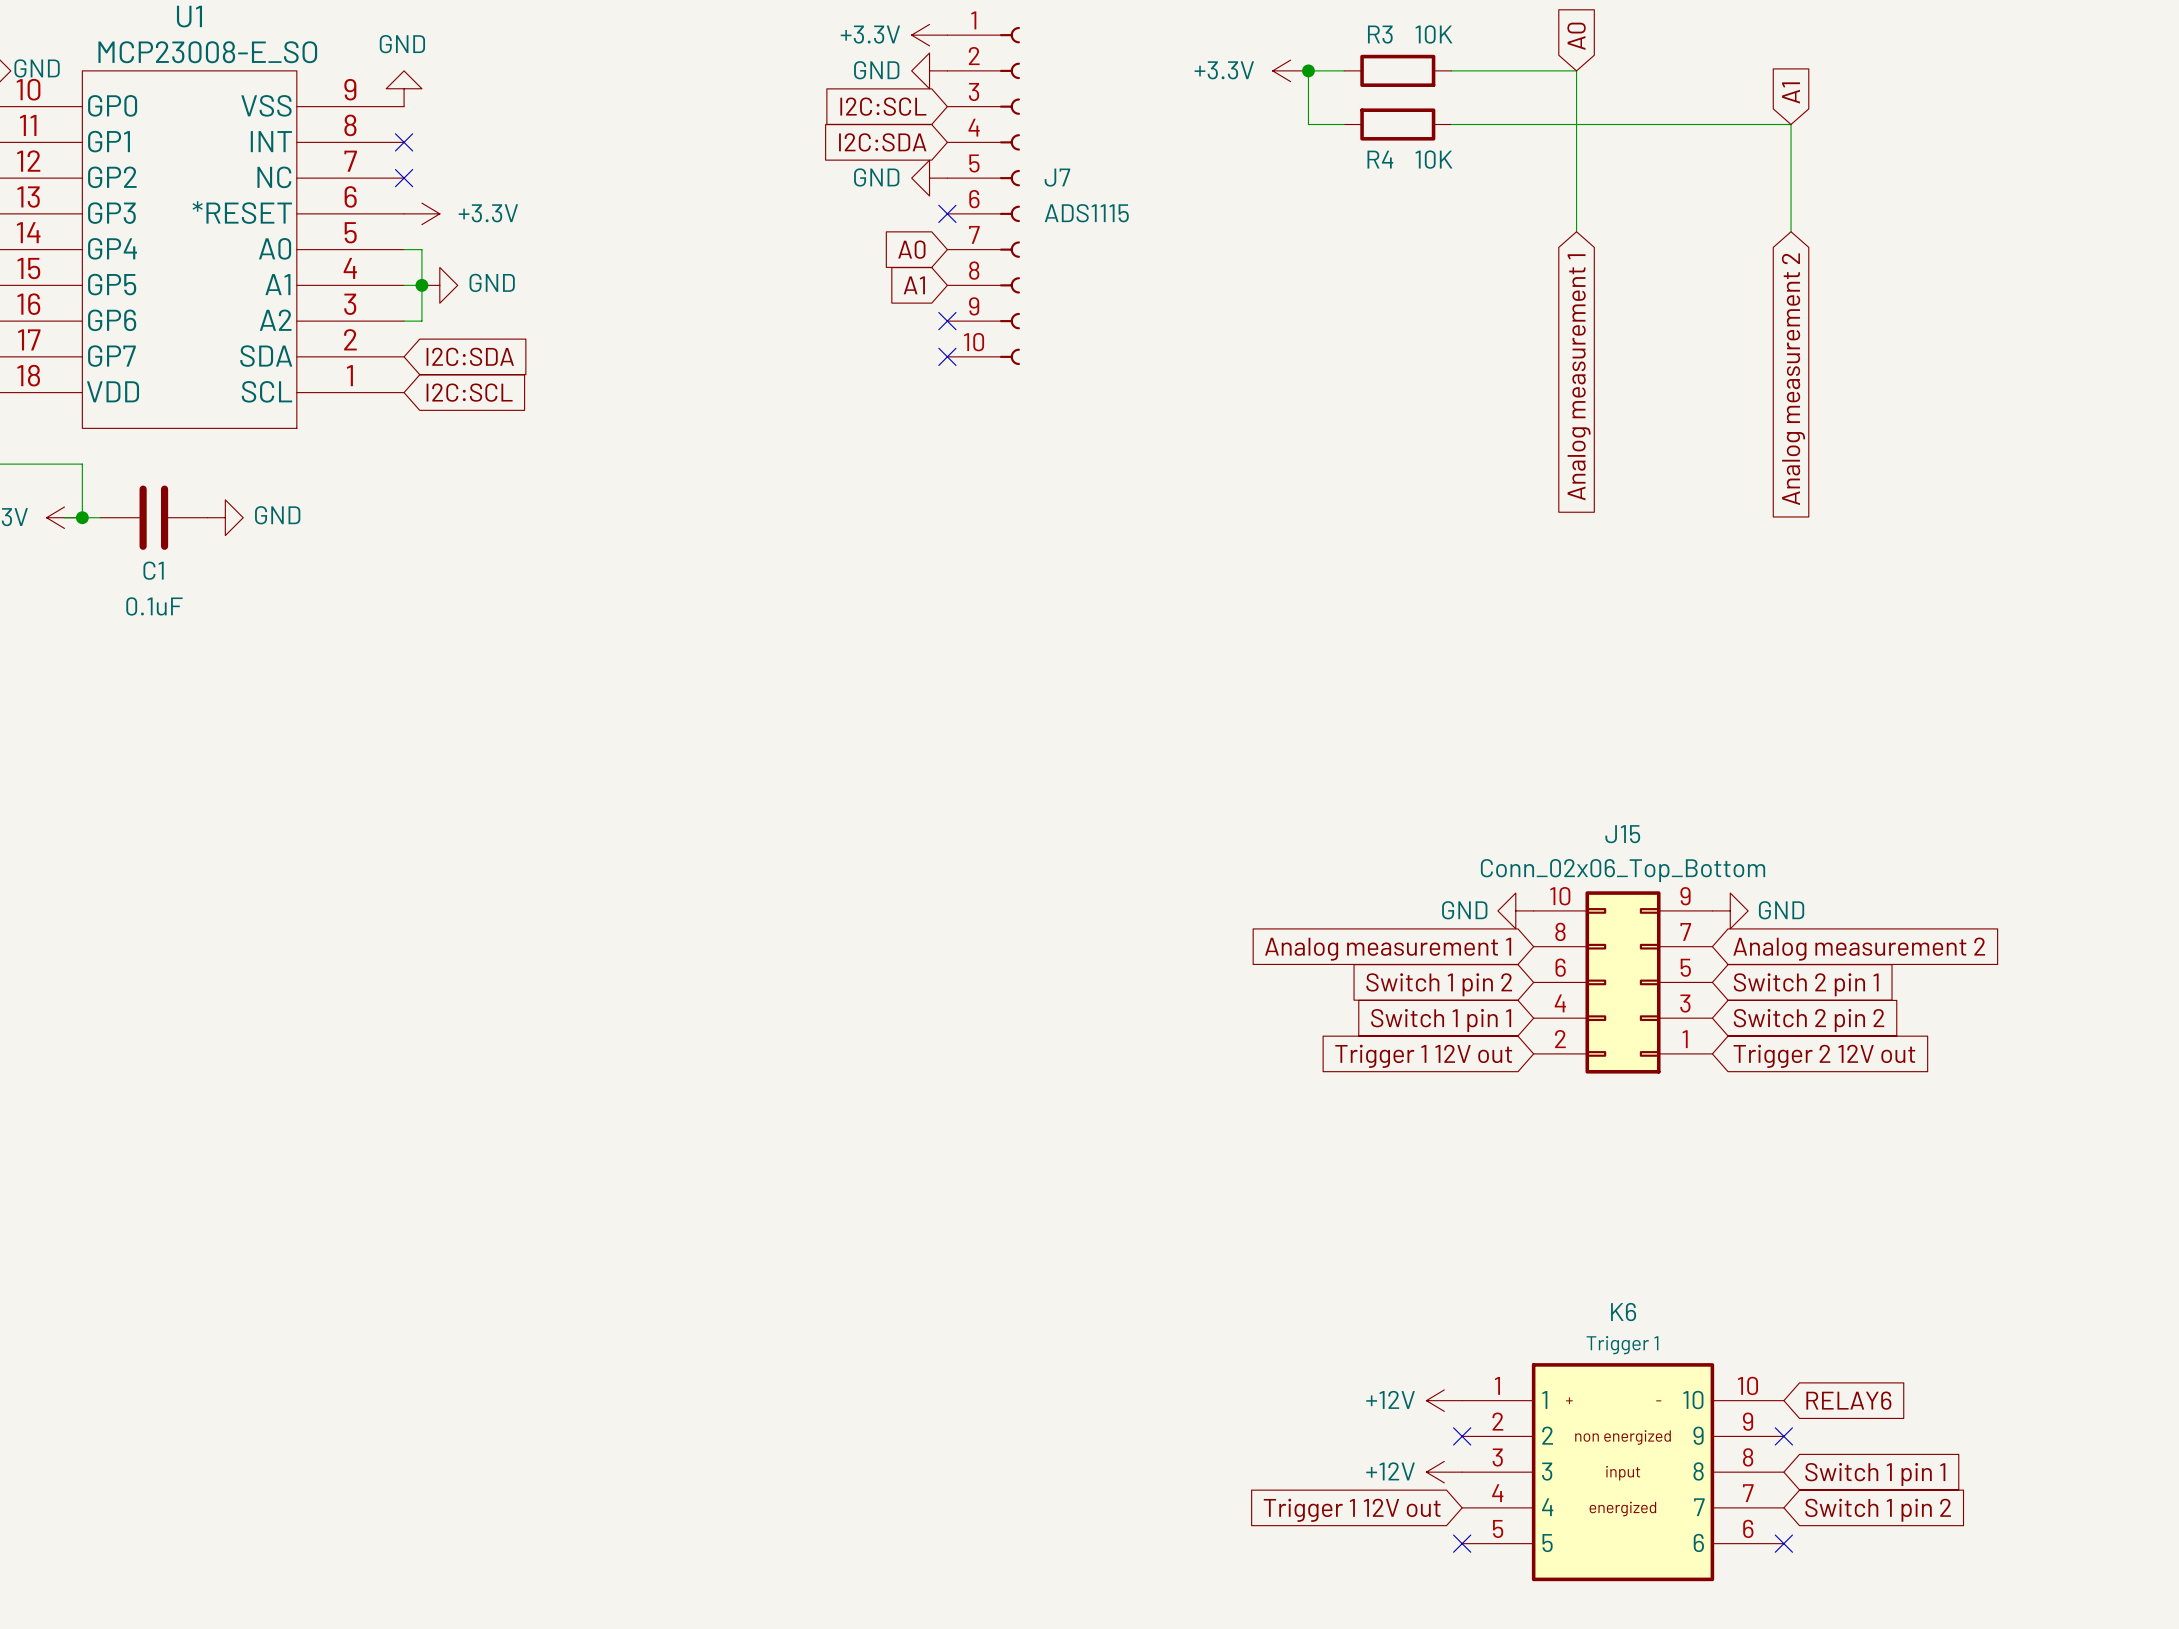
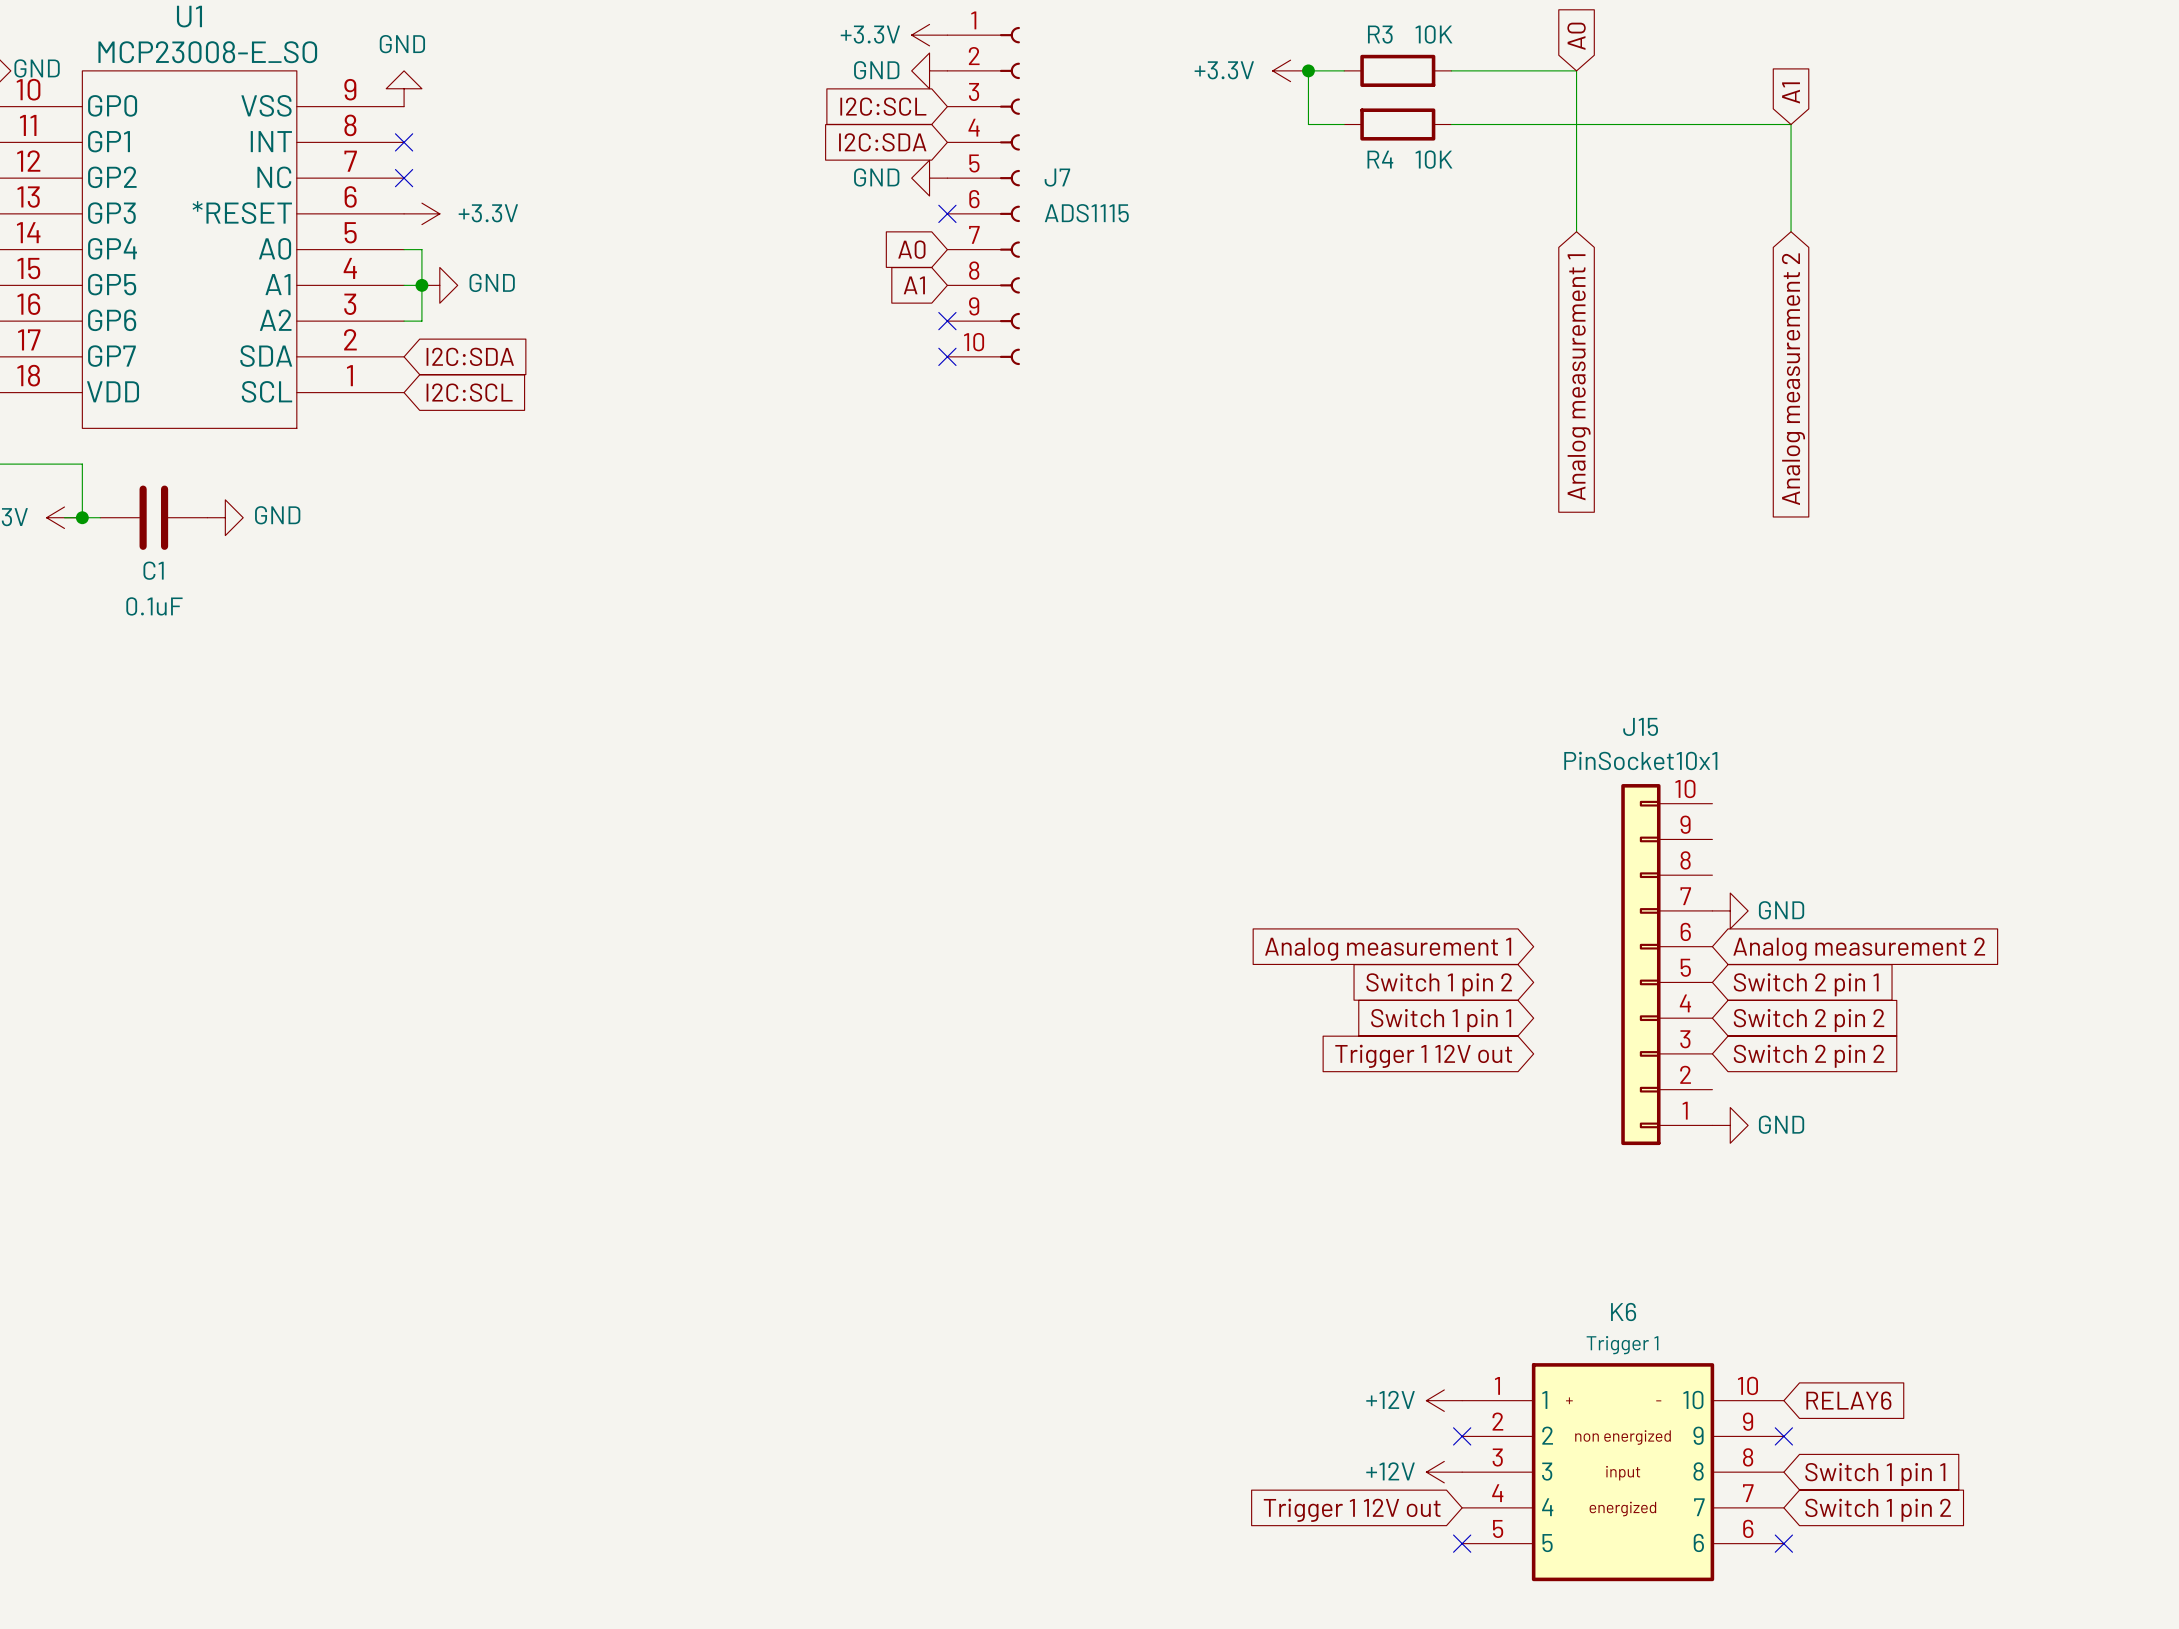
J15 name position: J15 (1622, 834) -> J15 (1640, 726)
J15 value: Conn_02x06_Top_Bottom (1623, 870) -> PinSocket10x1 (1640, 760)
J15 symbol: [1533, 891, 1713, 1074] -> [1621, 784, 1713, 1146]
power symbol rotation: 0° (1515, 910) -> 180° (1730, 1125)
power symbol position: GND (1515, 910) -> GND (1730, 1125)
global label: Trigger 2 12V out (1824, 1056) -> Switch 2 pin 2 (1809, 1056)

